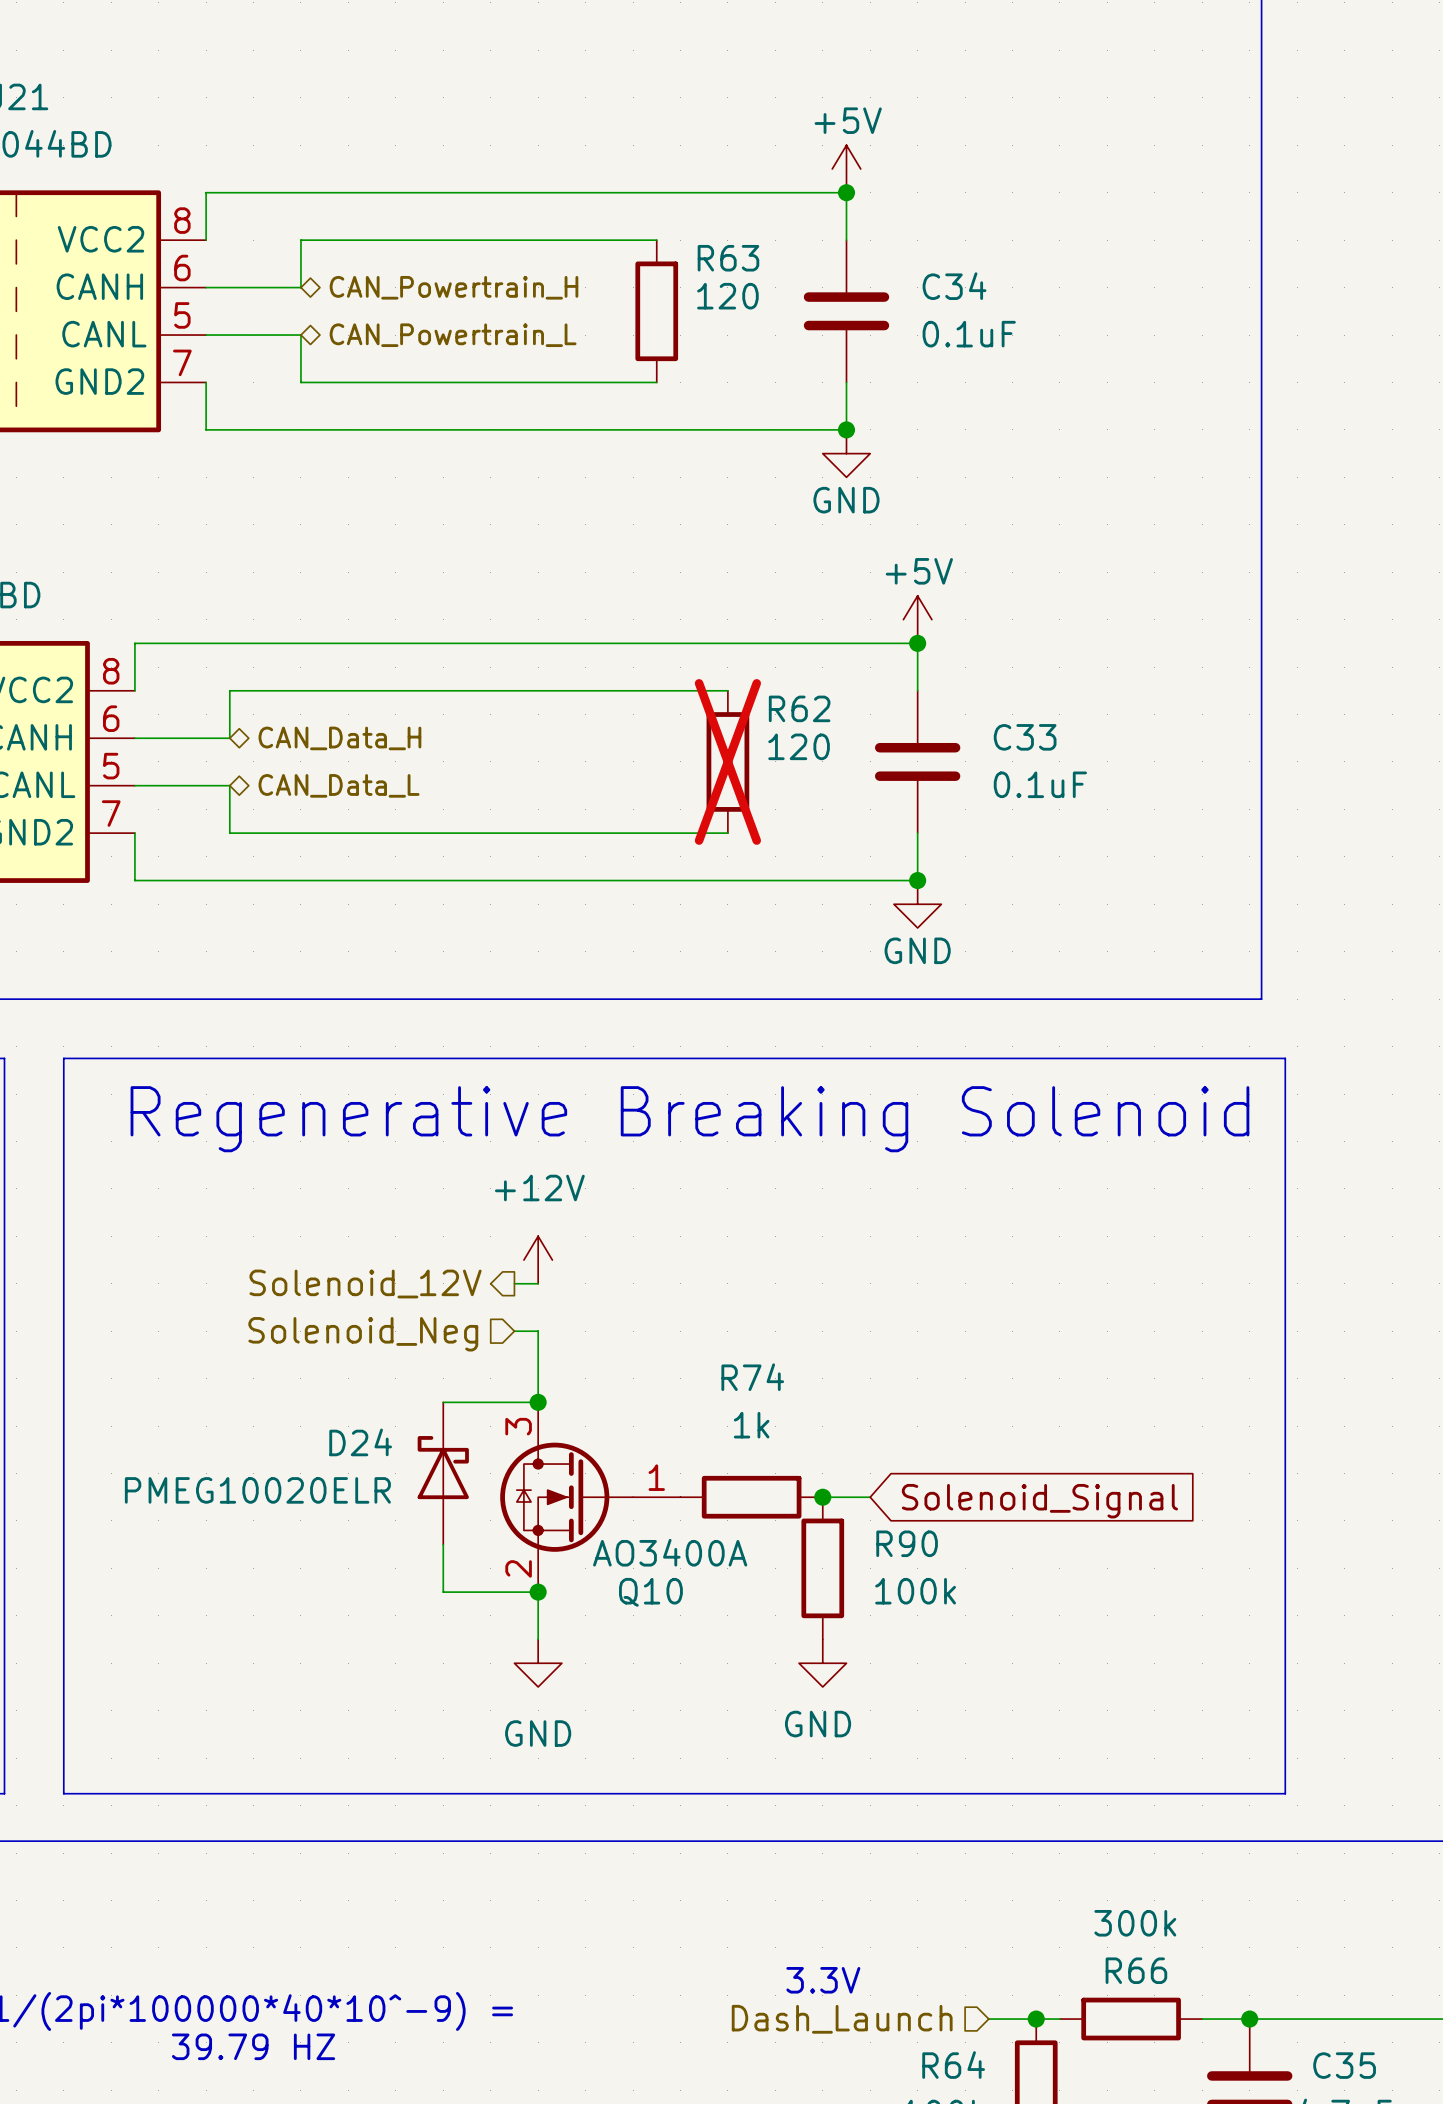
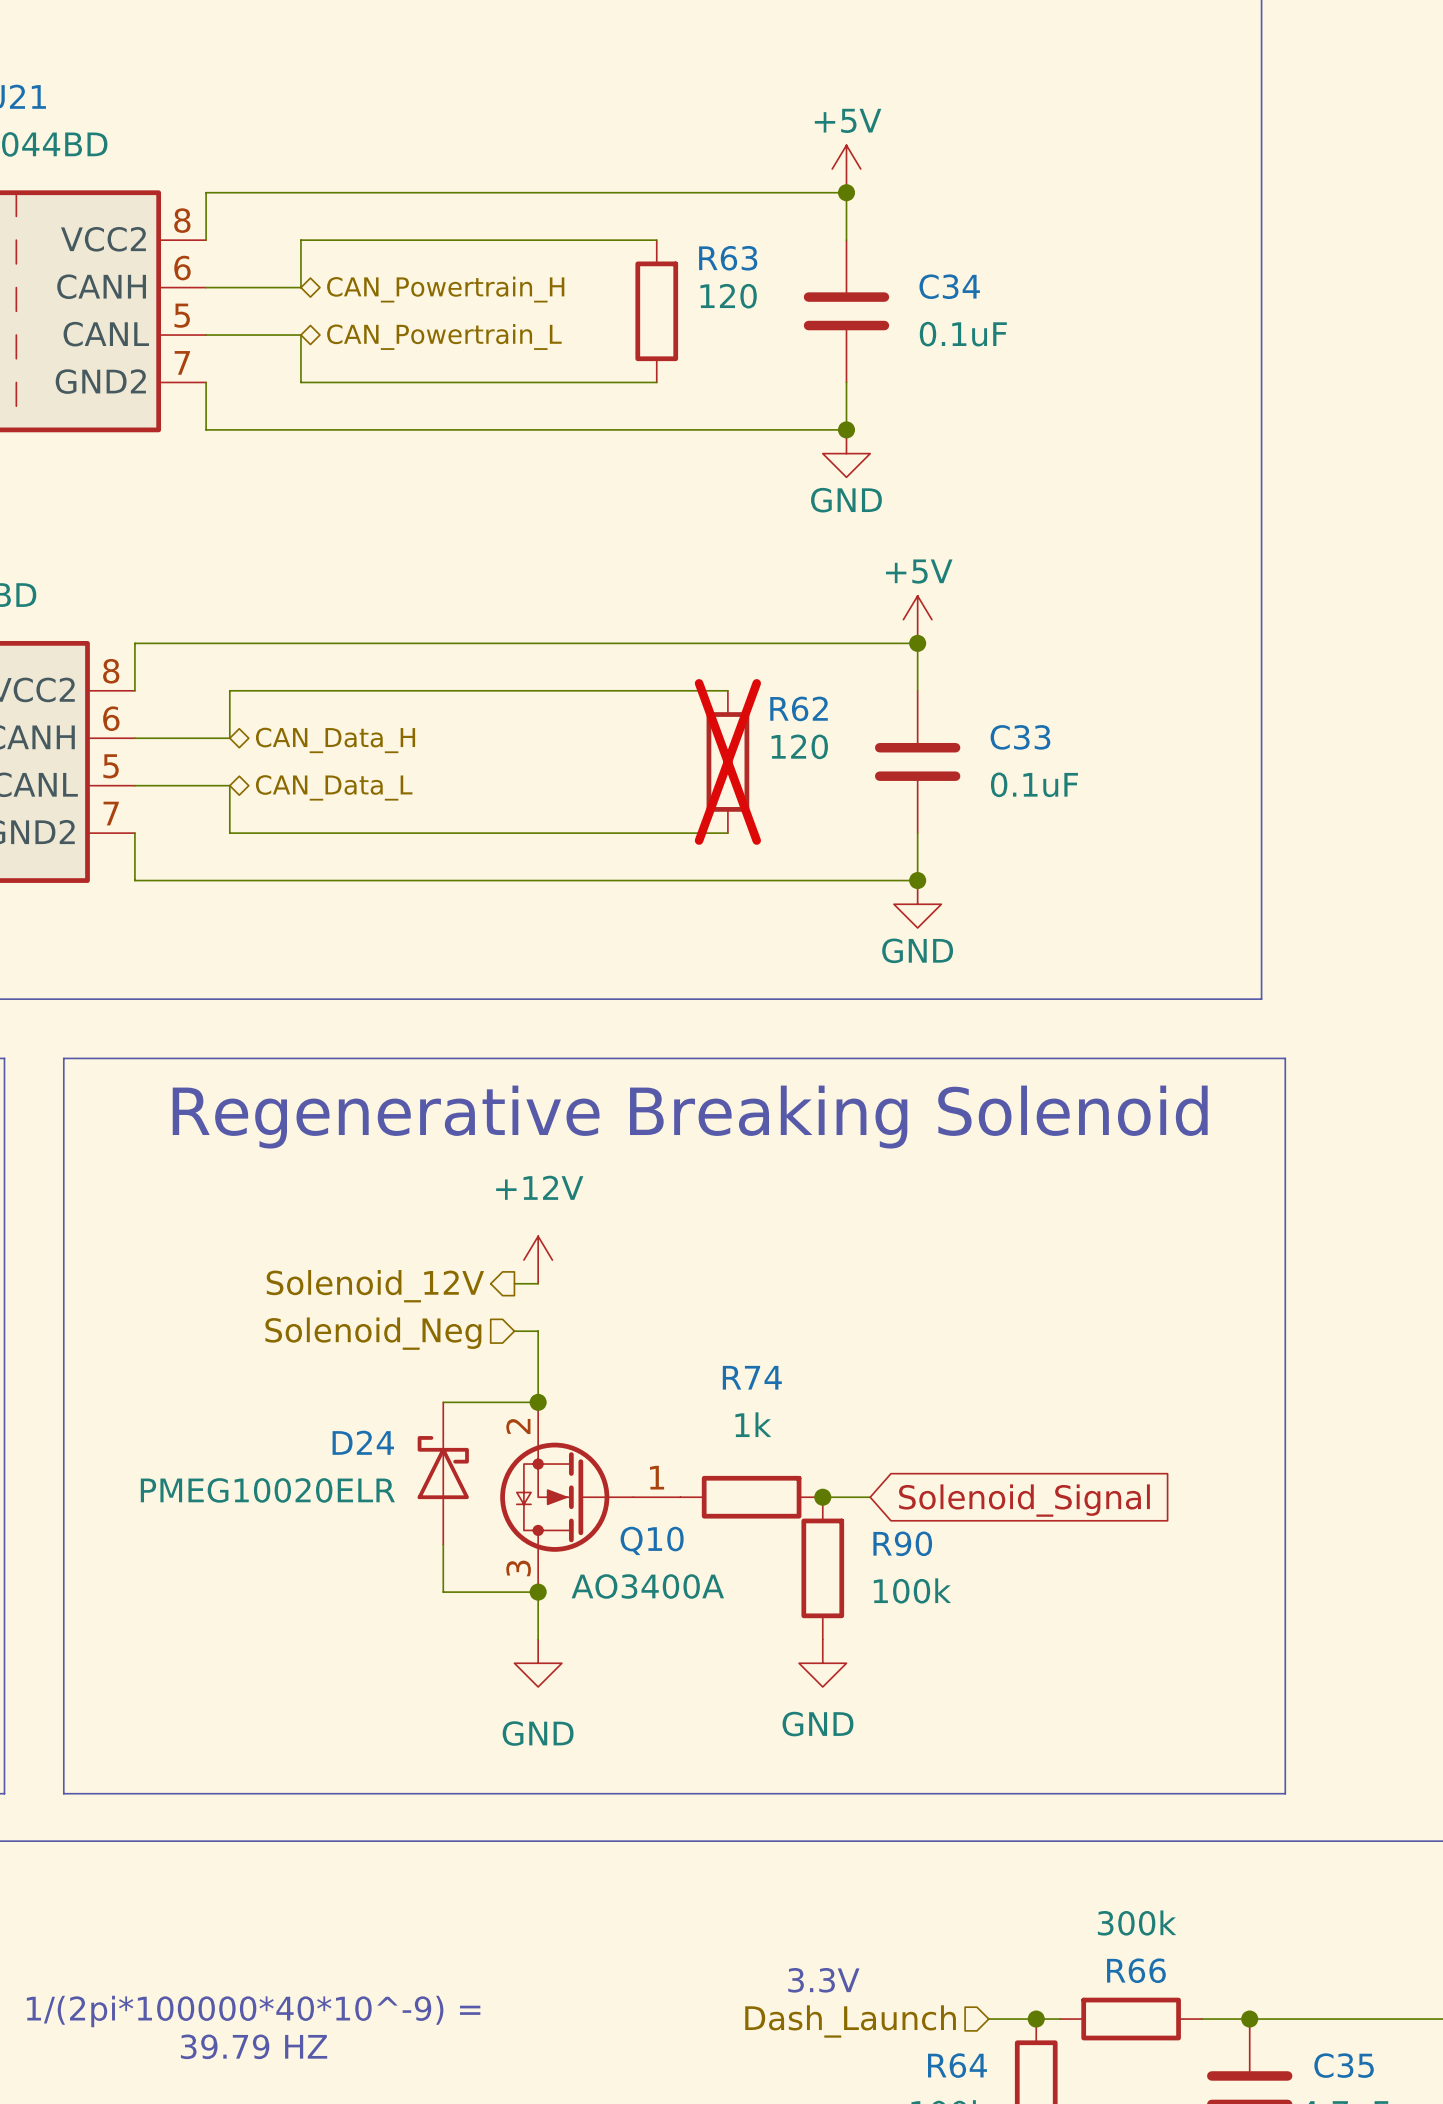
Q10 flip: as is (566, 1497) -> up-down (566, 1497)
Q10 value position: AO3400A (670, 1552) -> AO3400A (647, 1586)
Q10 name position: Q10 (650, 1592) -> Q10 (652, 1540)

